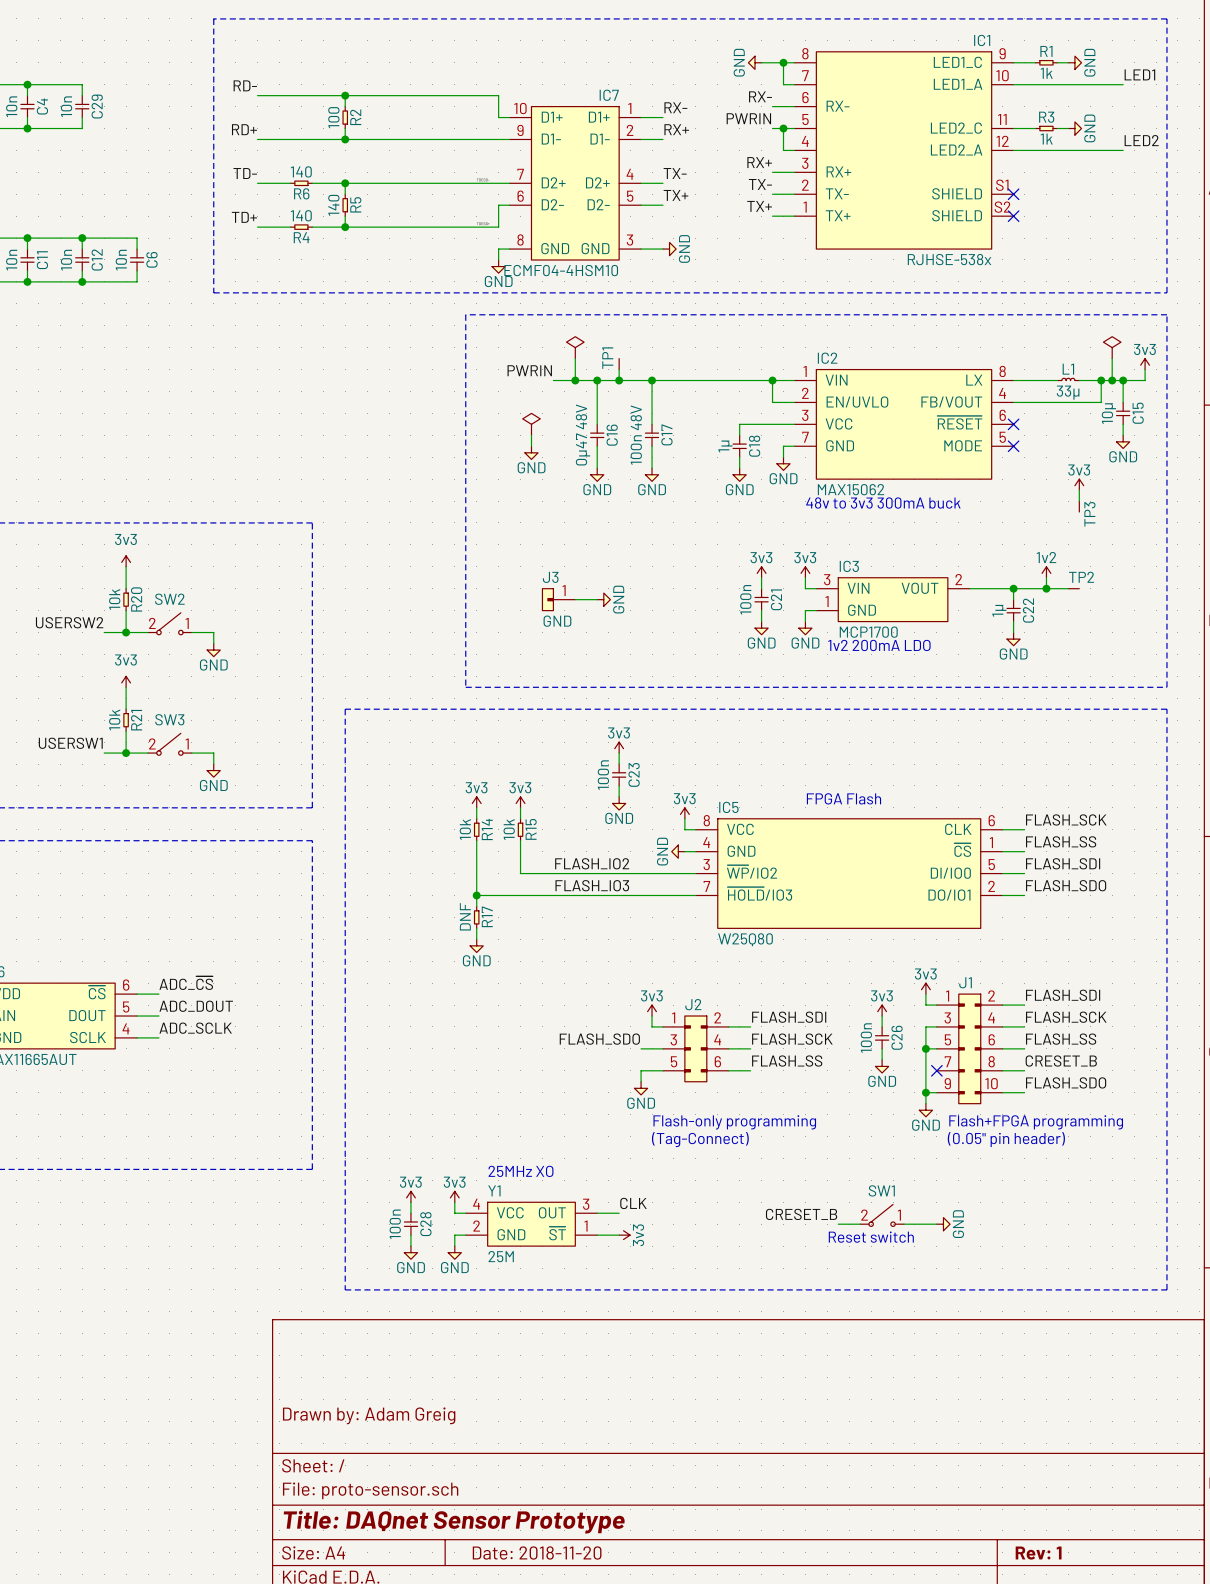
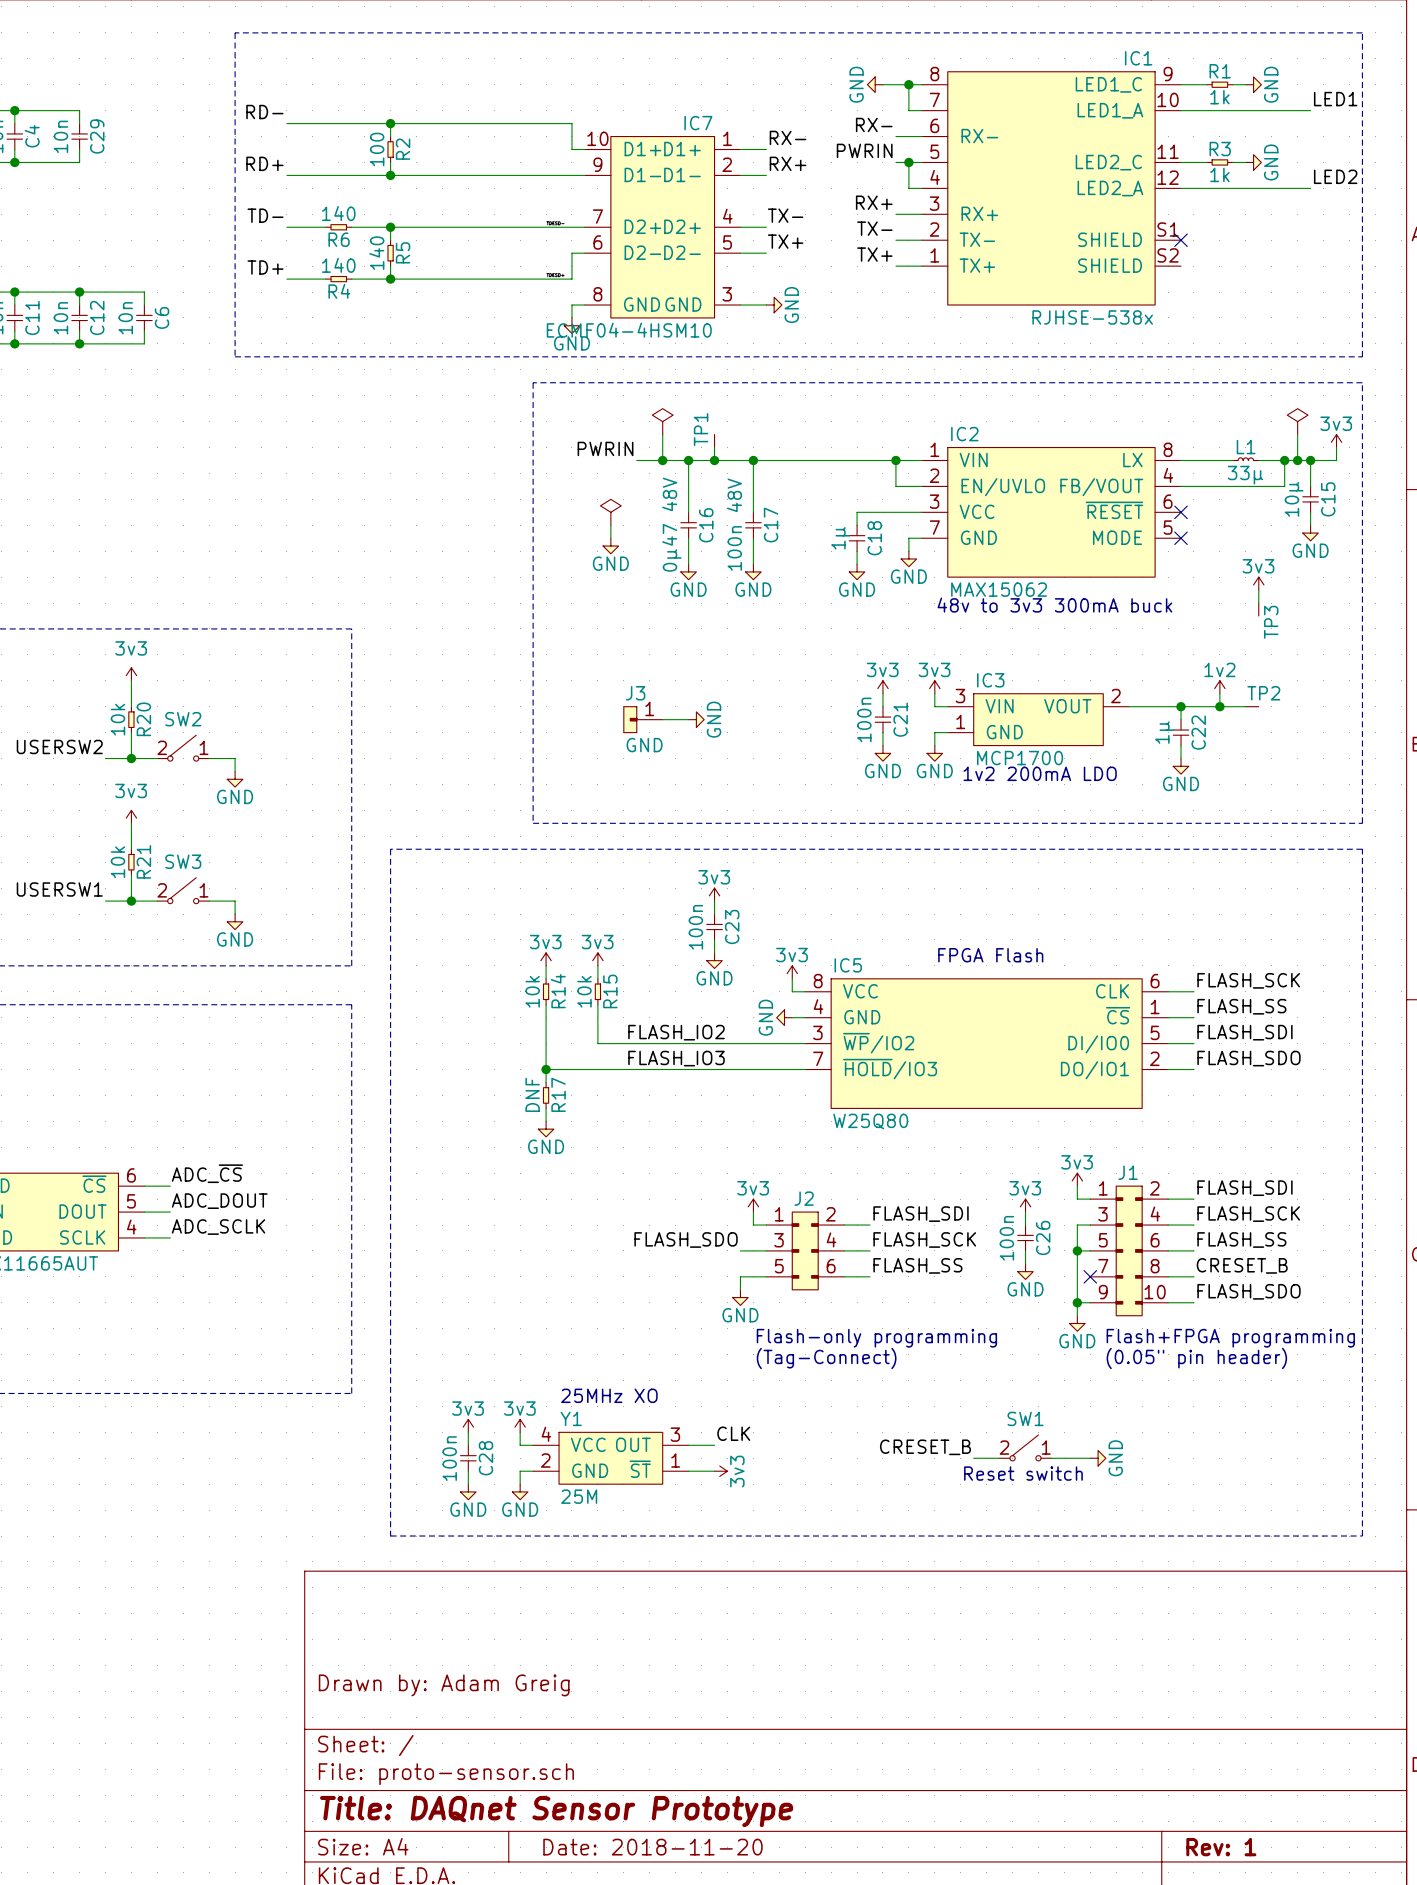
no-connect mark: (1013, 216) -> none

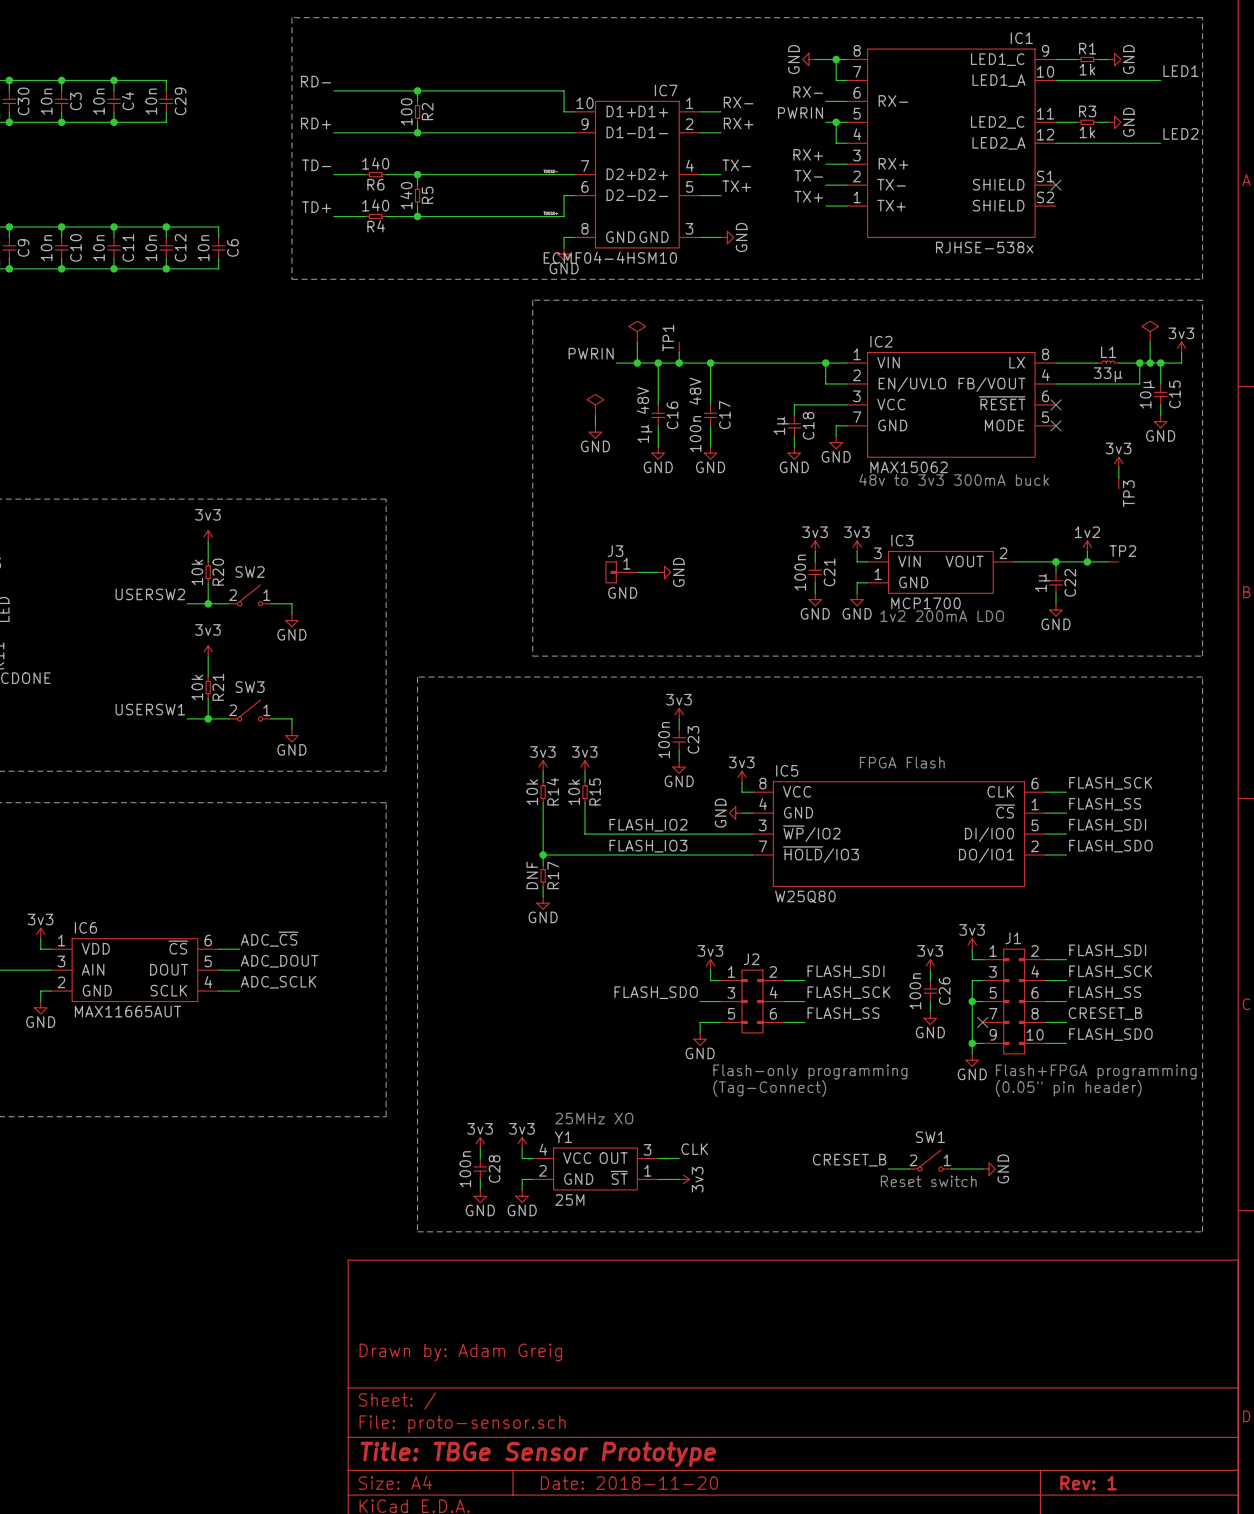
C16 value: 0µ47 48V (671, 524) -> 1µ 48V (644, 414)
title block: Title: DAQnet Sensor Prototype (556, 1811) -> Title: TBGe Sensor Prototype (538, 1454)

